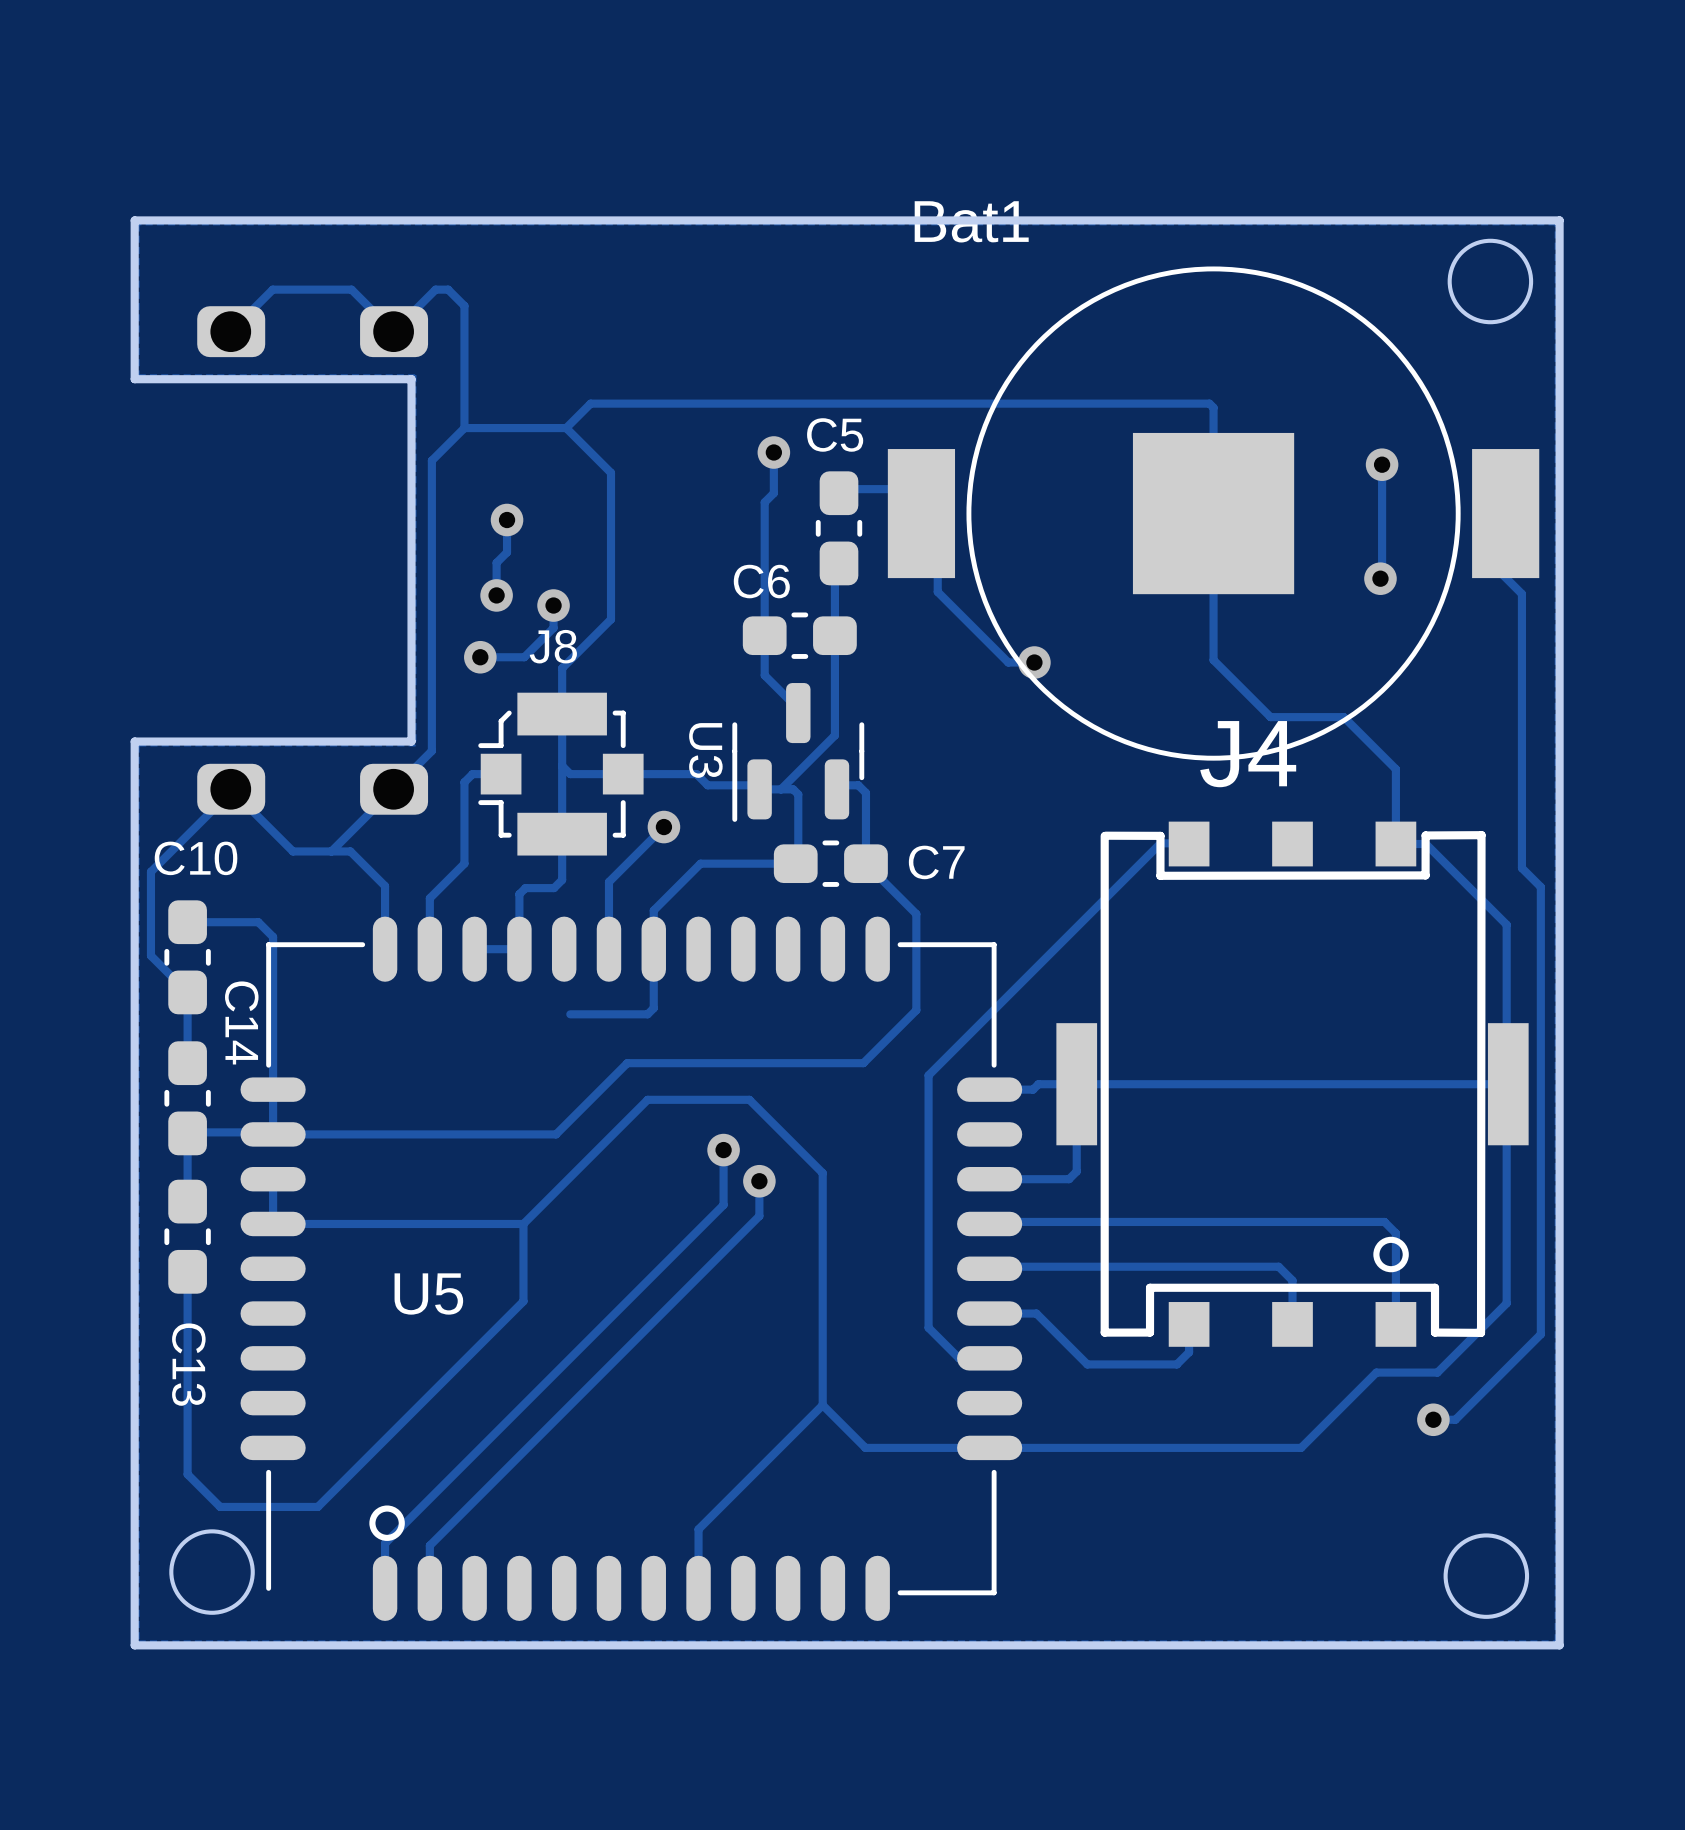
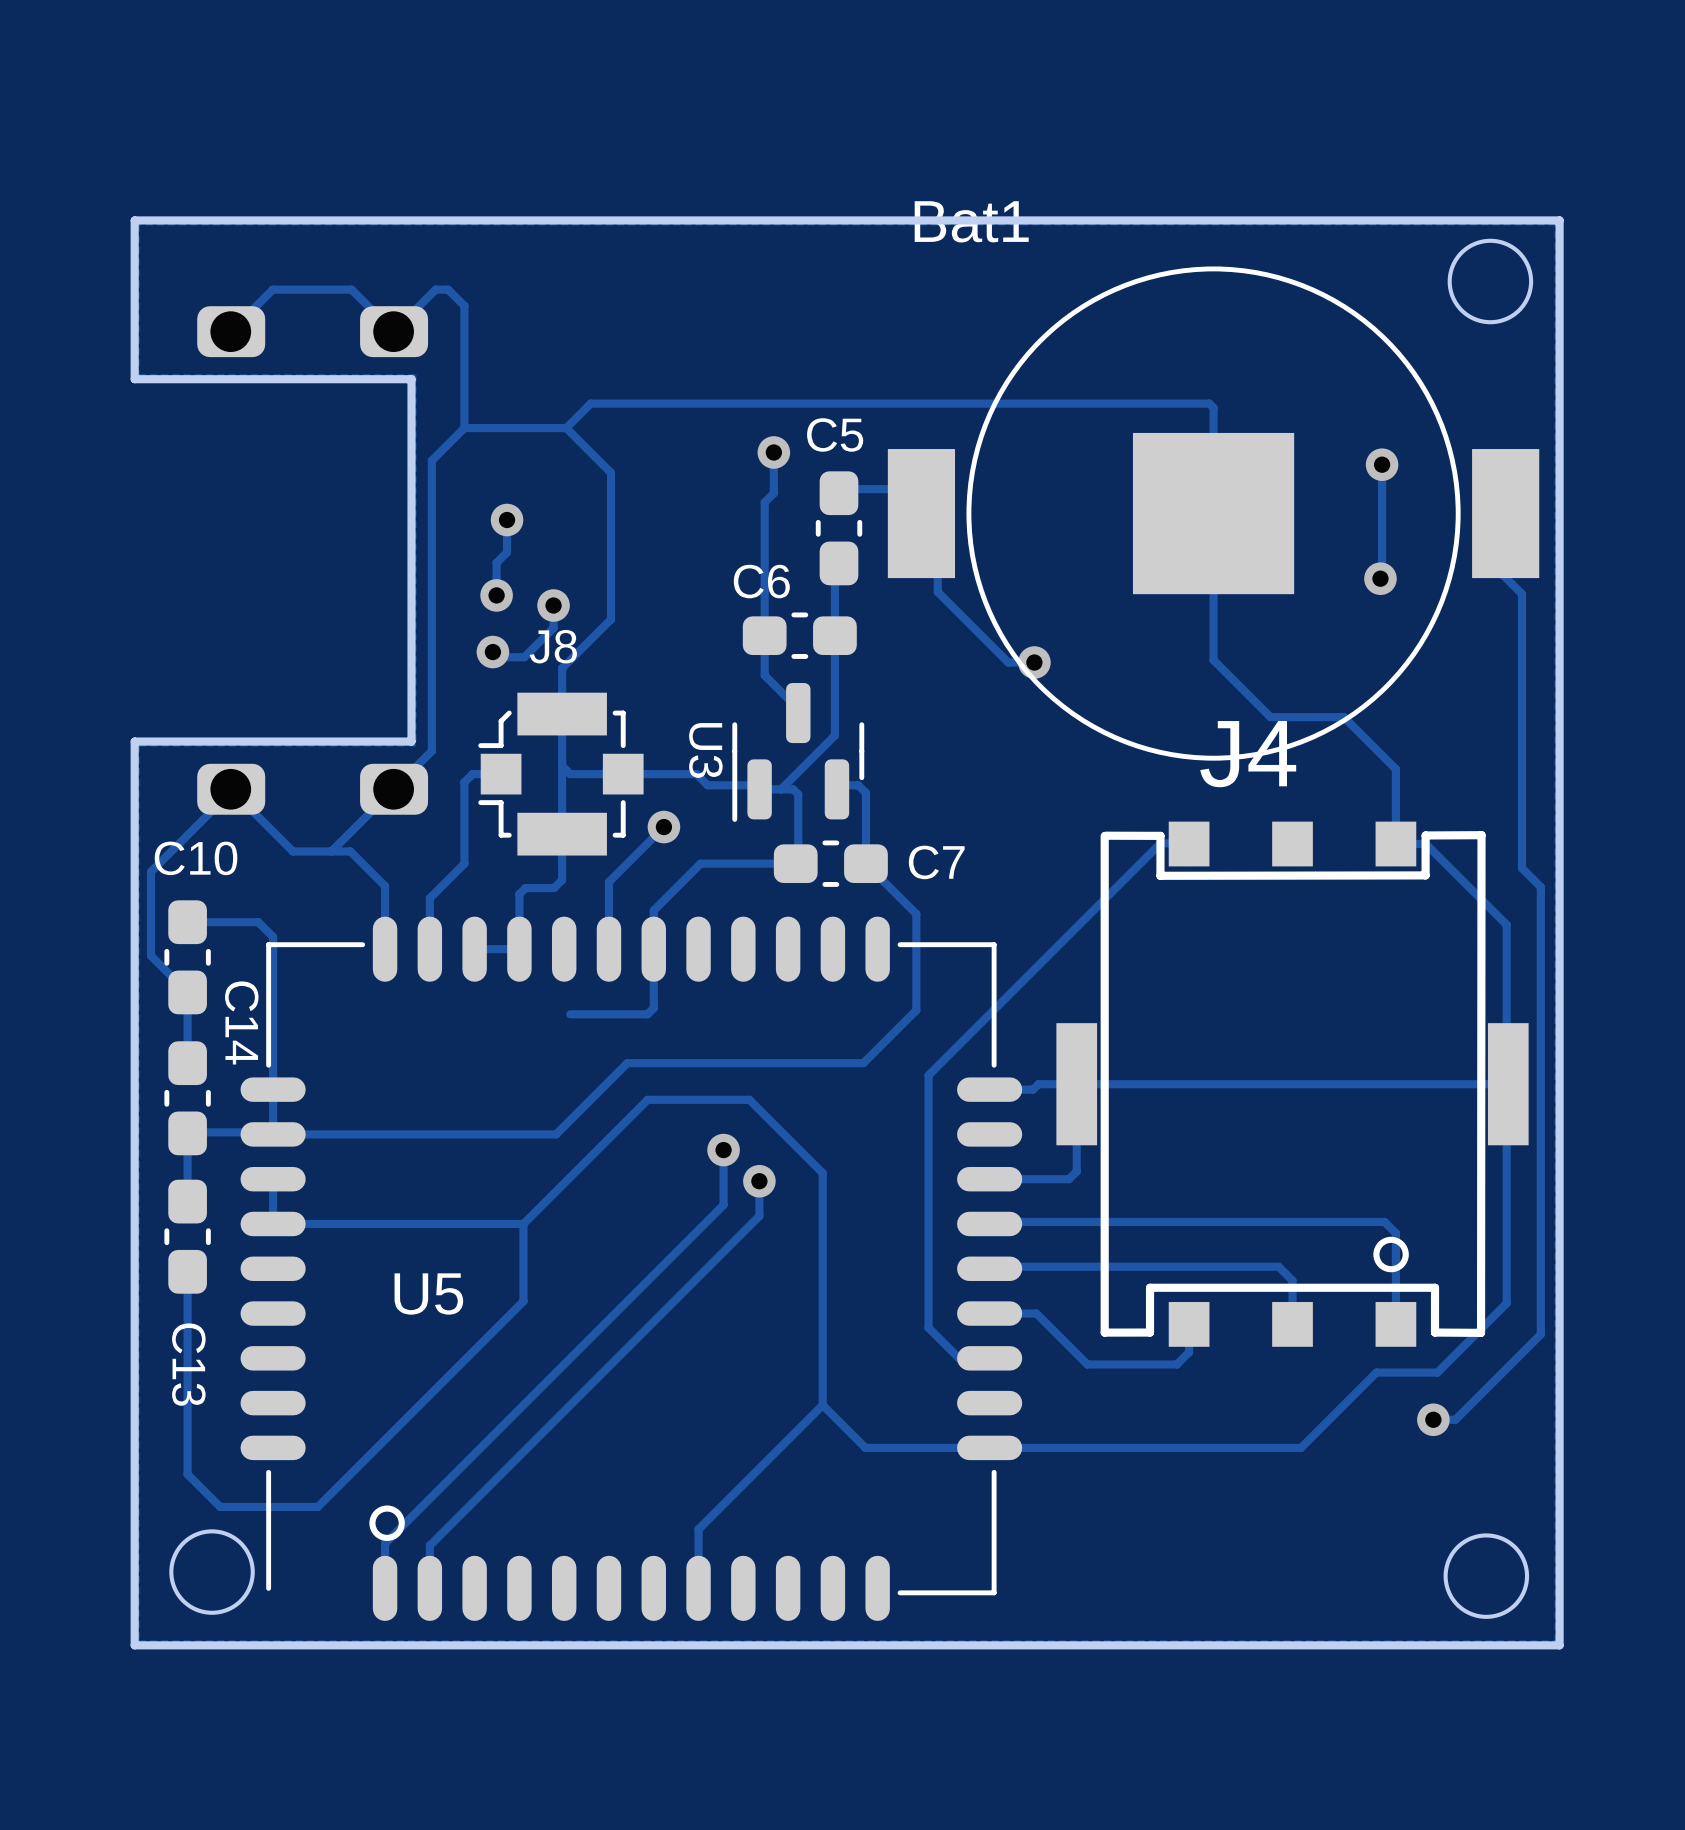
via position: (480, 657) -> (492, 652)

